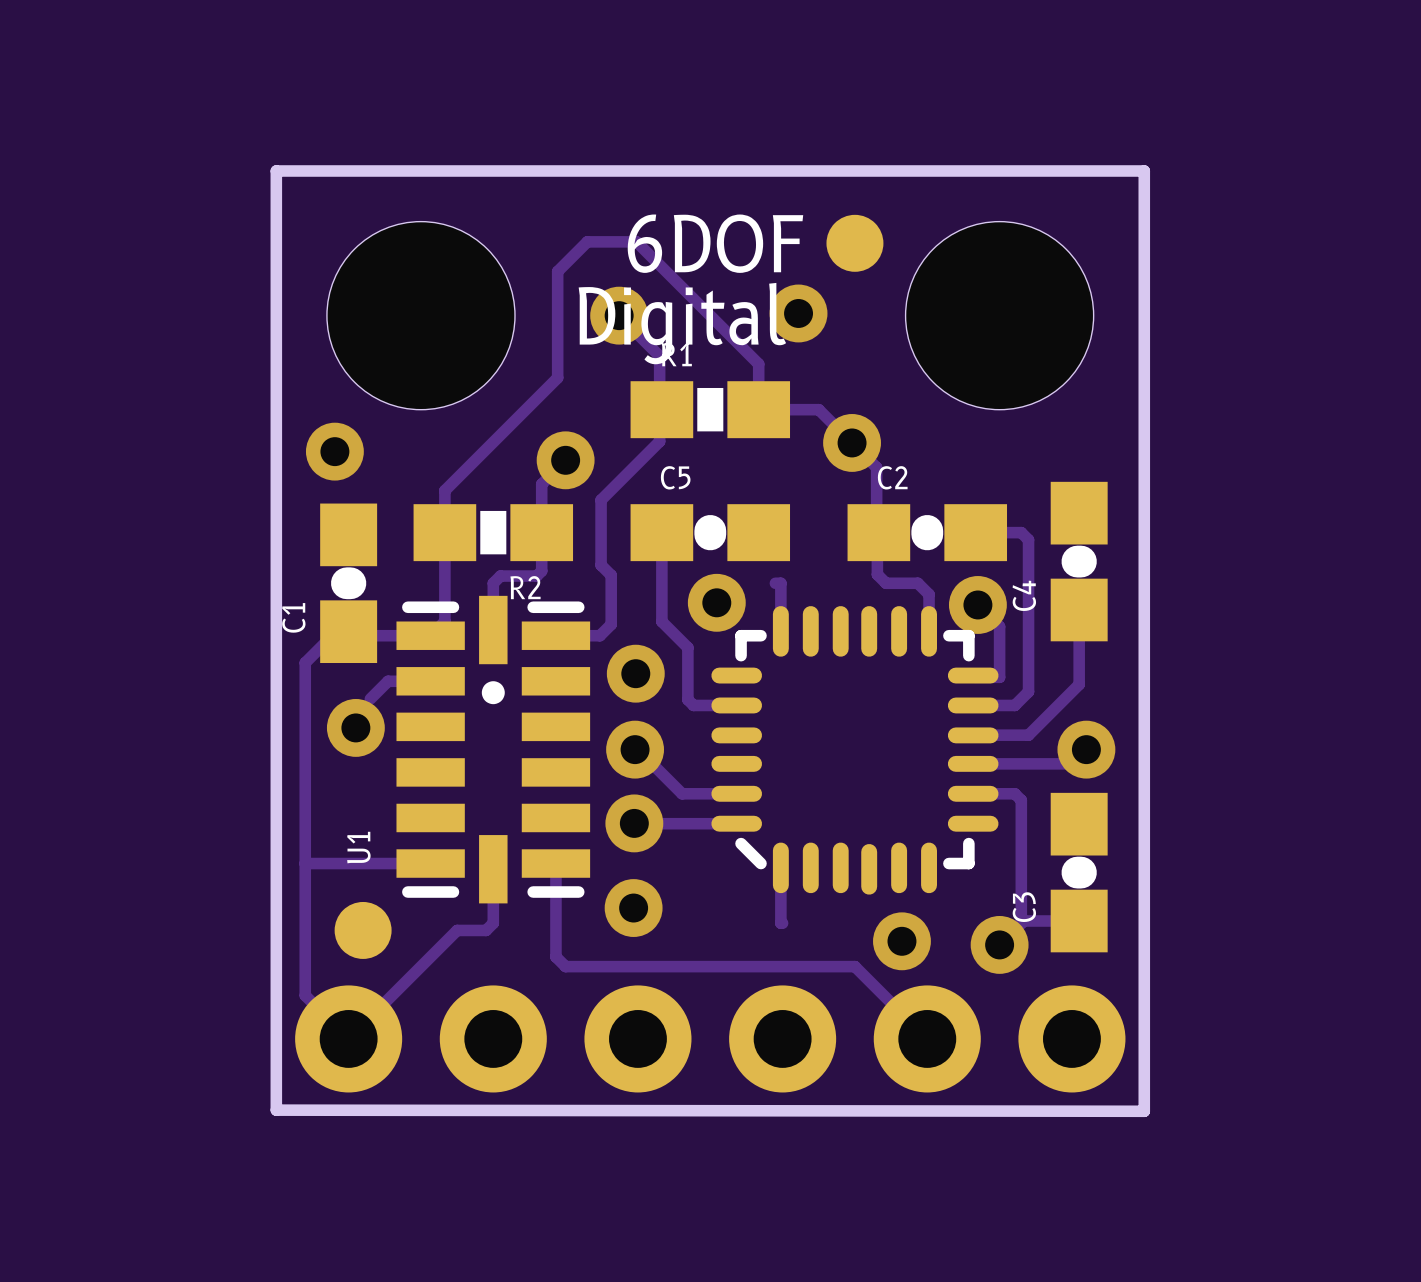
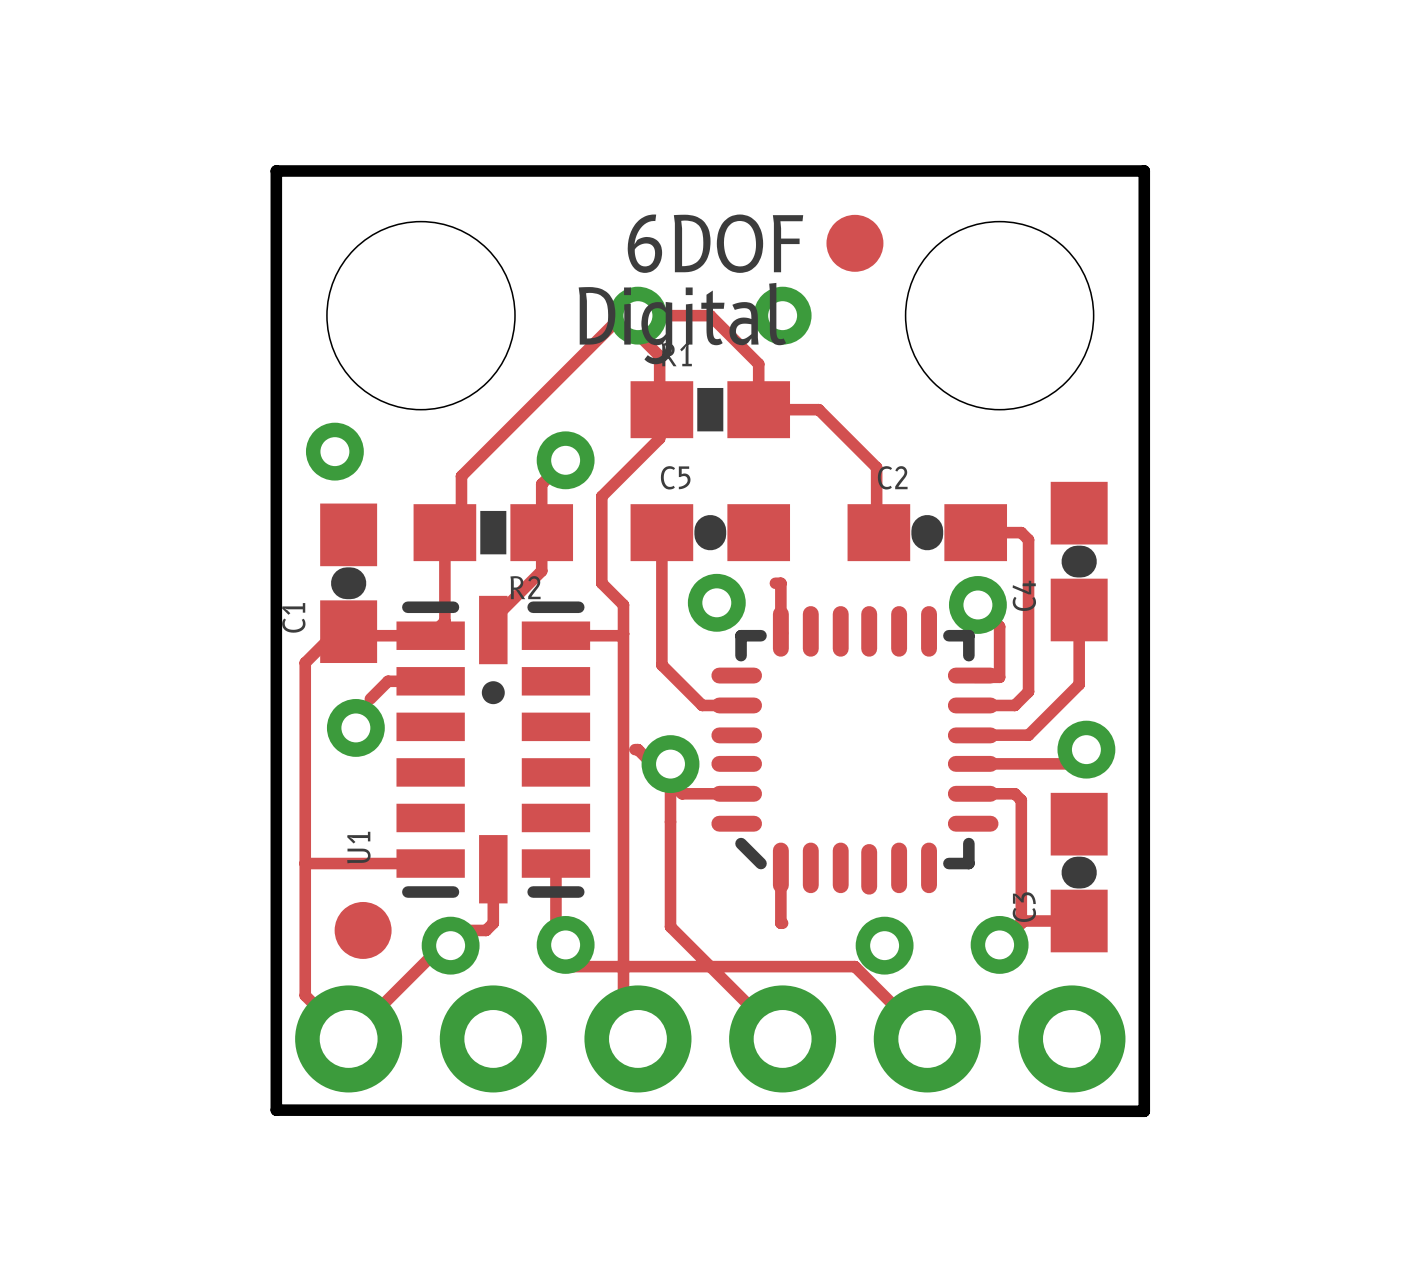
via position: (798, 313) -> (782, 315)
via position: (619, 315) -> (637, 315)
track: (710, 315) (636, 241) (587, 241) (557, 271) (557, 377) (444, 490) (444, 532) -> (710, 315) (622, 315) (461, 476) (461, 517) (444, 532)
track: (659, 438) (659, 441) (601, 500) (601, 565) (611, 575) (611, 624) (599, 635) -> (623, 633) (621, 635) (599, 635)
track: none -> (659, 438) (601, 496) (601, 583) (623, 604) (623, 1024) (637, 1038)
via: (852, 442) -> none
track: (878, 532) (877, 574) (886, 583) (917, 583) (929, 594) (929, 631) -> none
track: (536, 576) (500, 576) (493, 583) (493, 619) -> (536, 576) (493, 619)
track: (661, 621) (687, 647) (687, 699) (693, 705) (702, 705) -> (661, 621) (661, 665) (702, 705)
via: (635, 673) -> none
via position: (635, 749) -> (670, 764)
track: none -> (670, 764) (670, 926) (782, 1038)
track: (634, 823) (736, 823) -> none
via: (634, 823) -> none
via: (633, 908) -> none
via position: (901, 941) -> (884, 945)
via: none -> (565, 944)
via: none -> (450, 945)

